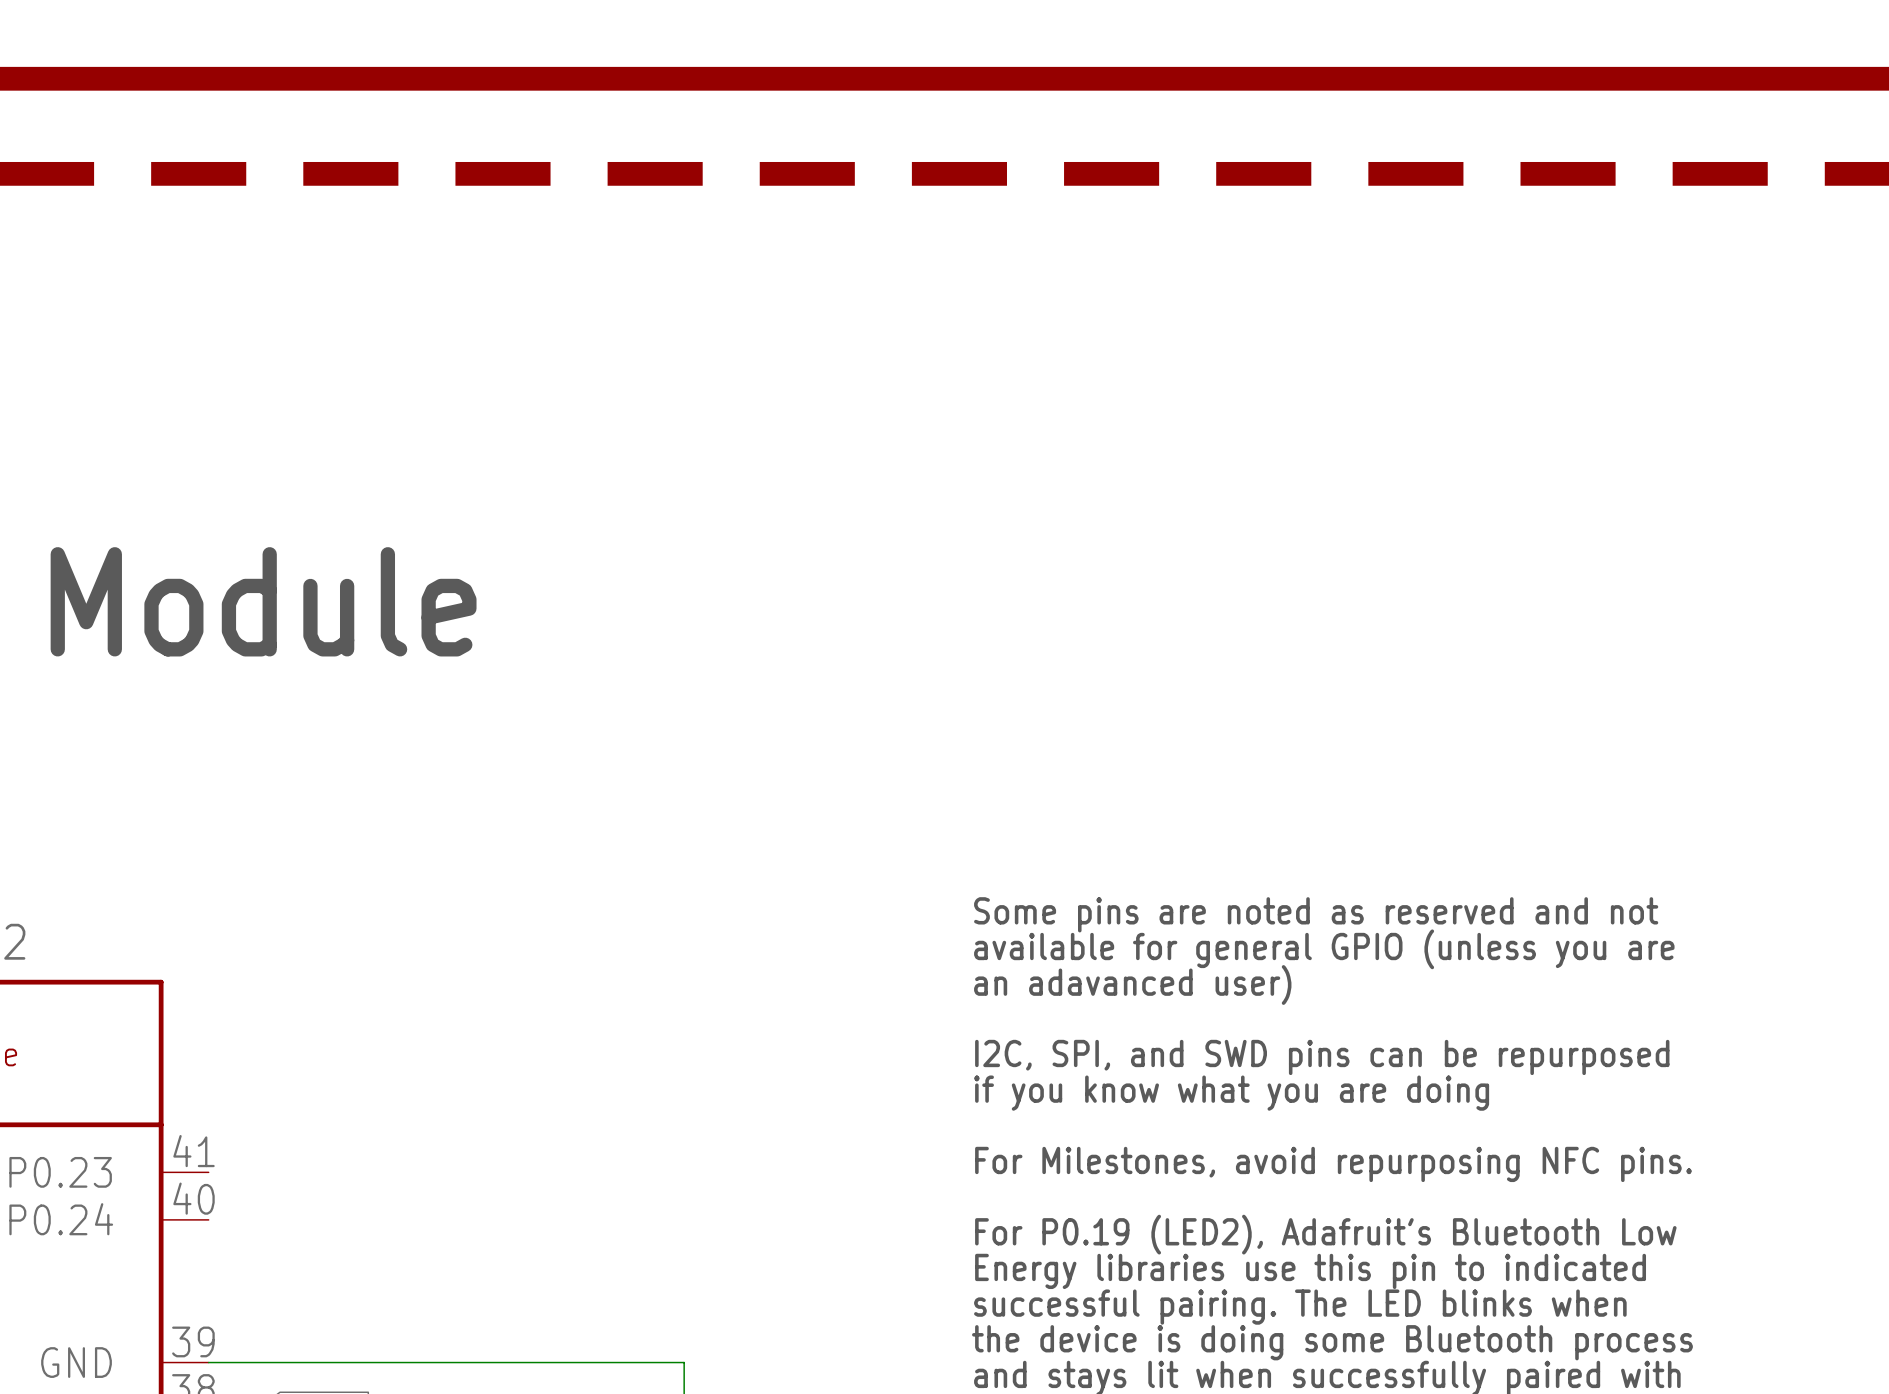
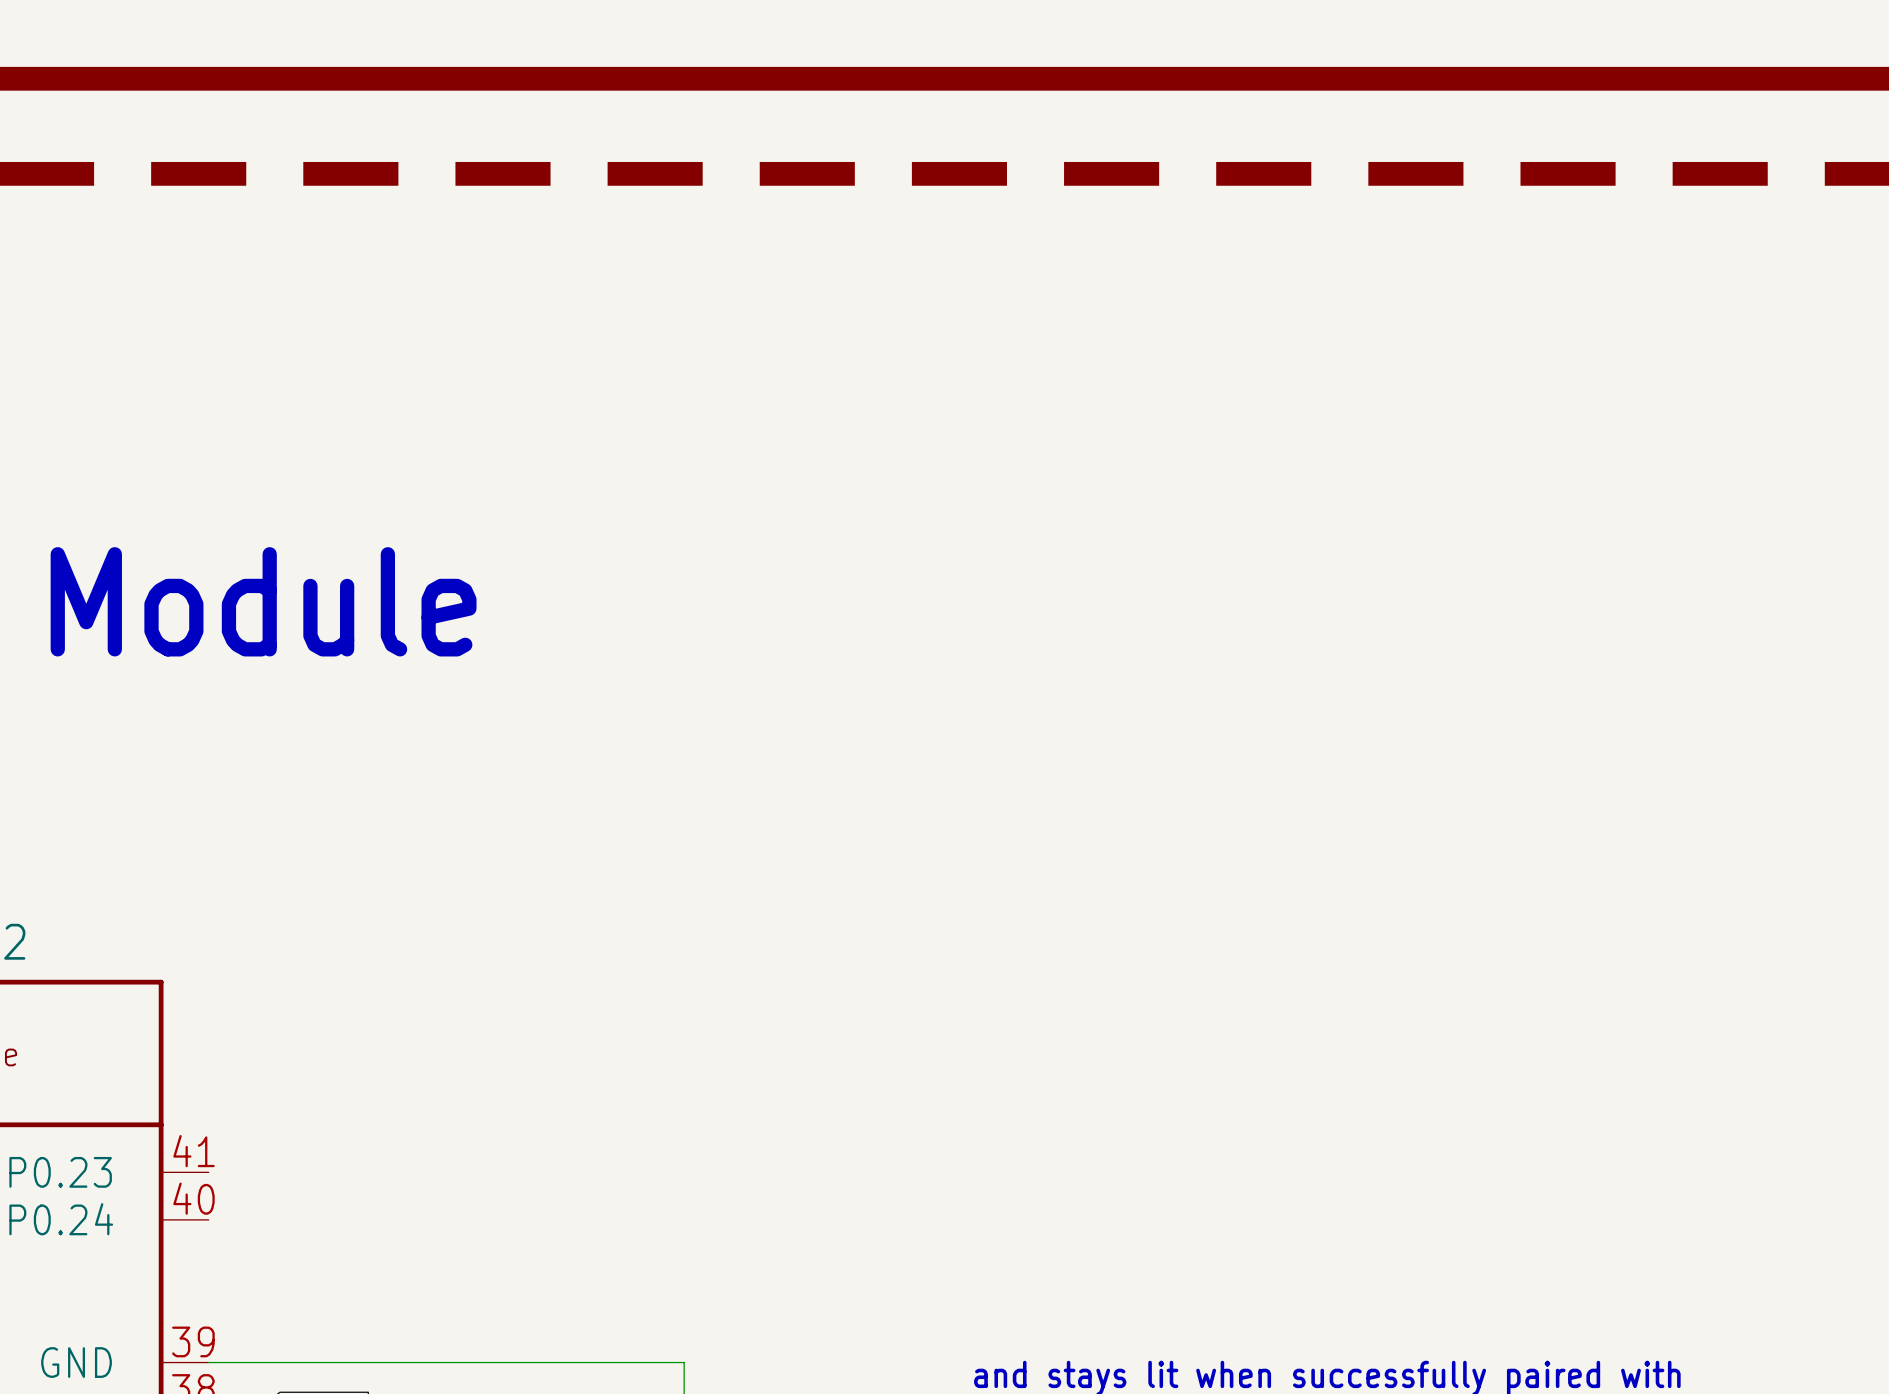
text: Some pins are noted as reserved and not (1316, 914) -> none
text: available for general GPIO (unless you are (1324, 949) -> none
text: an adavanced user) (1132, 985) -> none
text: I2C, SPI, and SWD pins can be repurposed (1322, 1057) -> none
text: if you know what you are doing (1231, 1093) -> none
text: For Milestones, avoid repurposing NFC pins. (1333, 1164) -> none
text: For P0.19 (LED2), Adafruit's Bluetooth Low (1325, 1234) -> none
text: Energy libraries use this pin to indicated (1310, 1271) -> none
text: successful pairing. The LED blinks when (1300, 1307) -> none
text: the device is doing some Bluetooth process (1332, 1342) -> none

